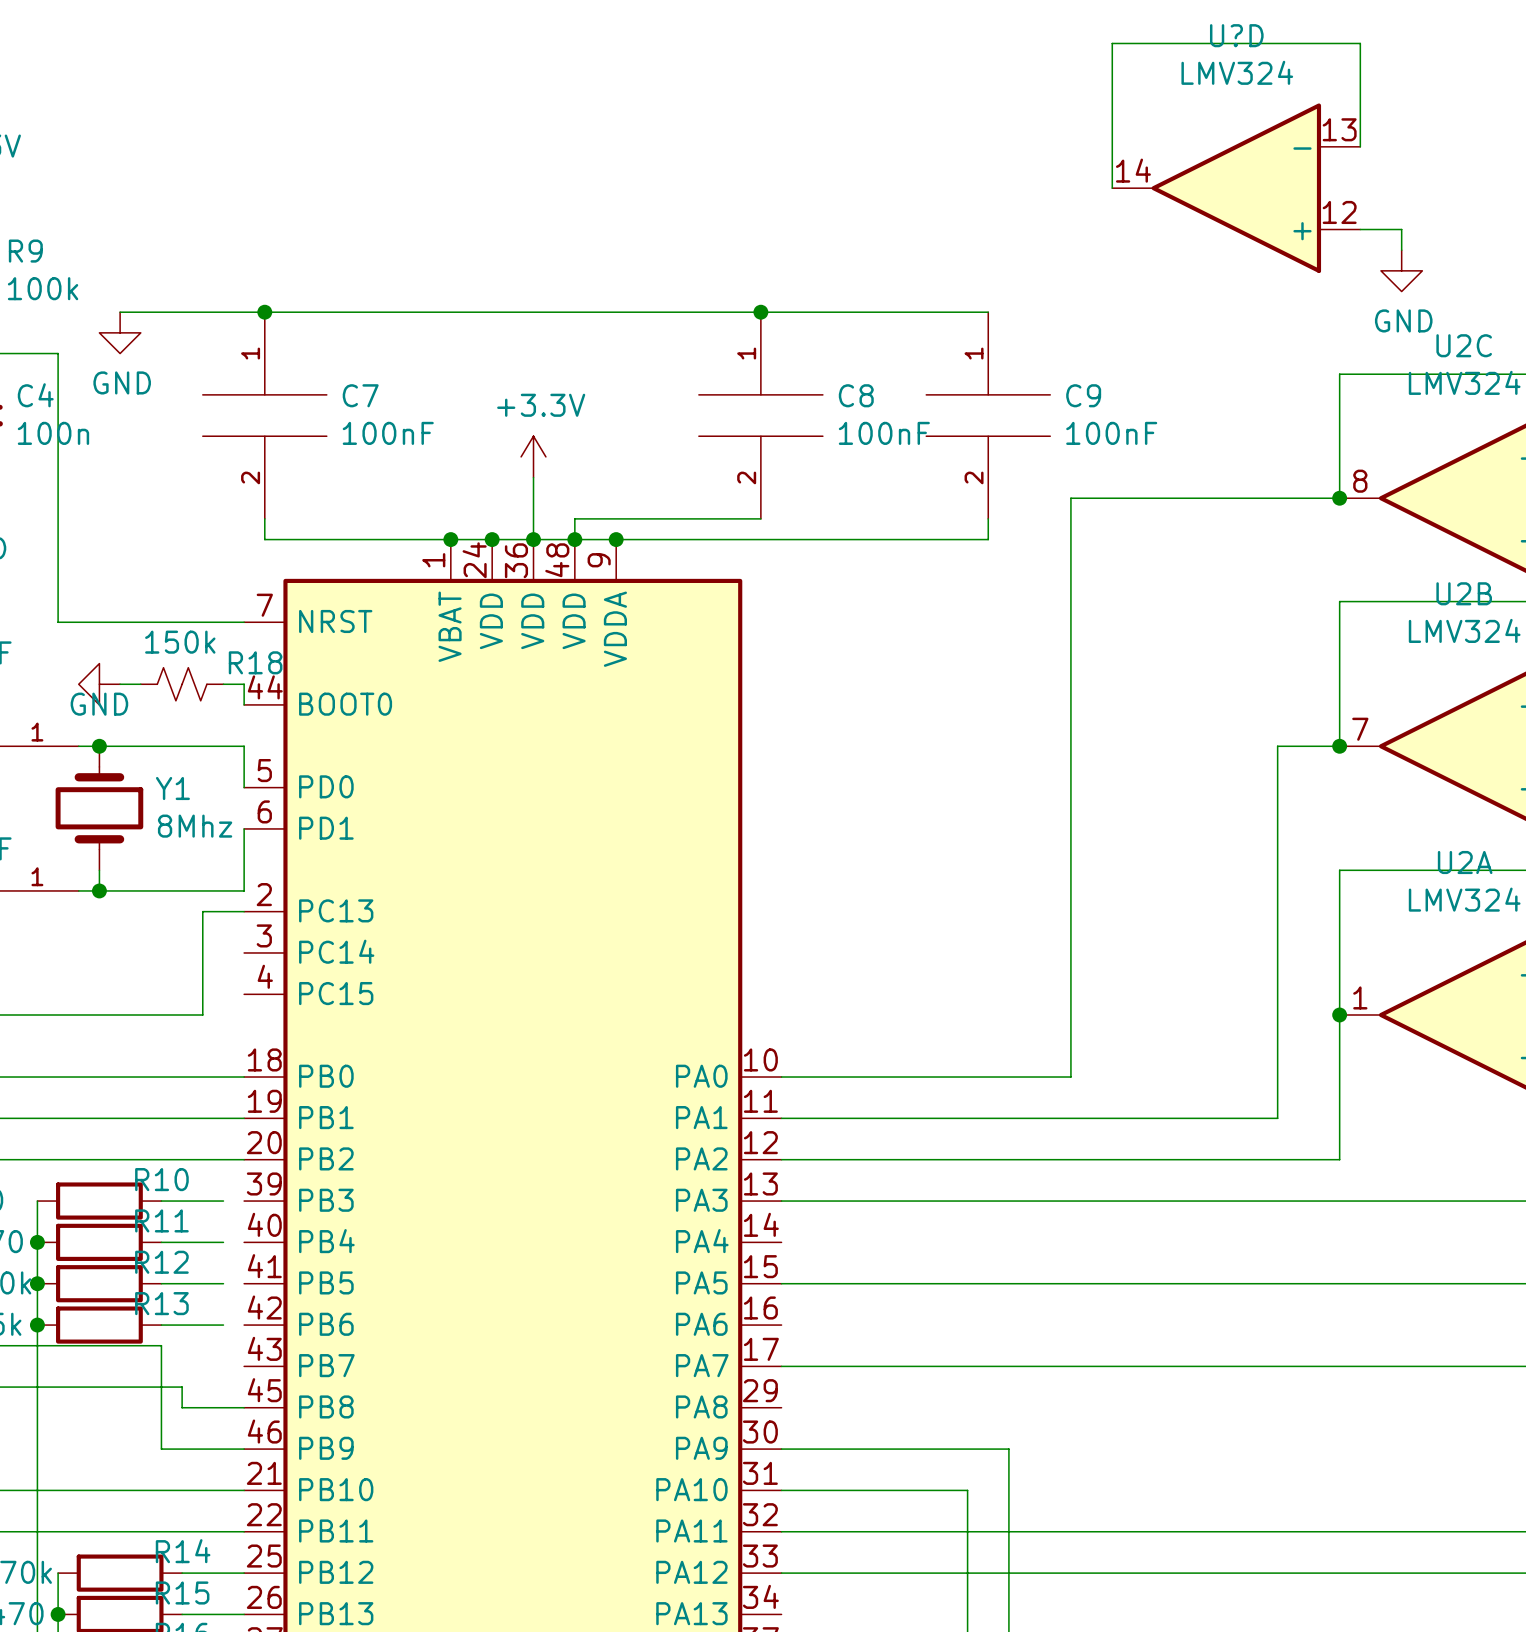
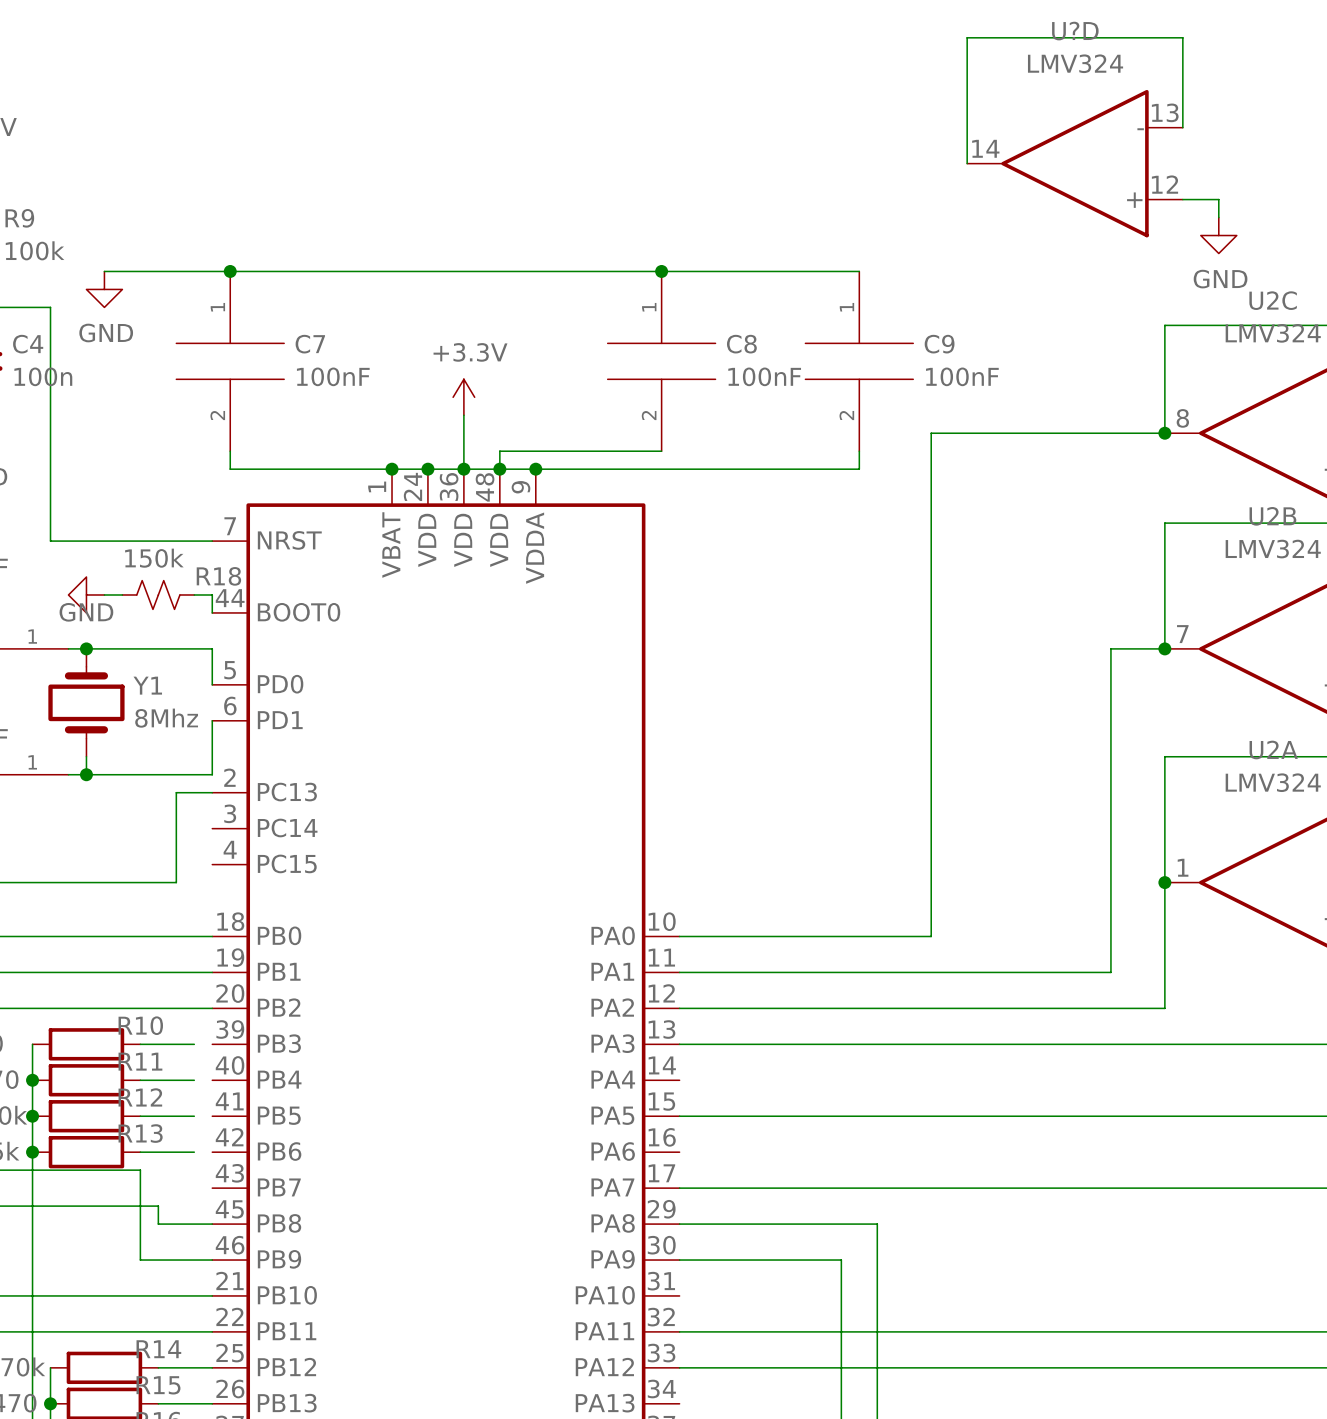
wire: none -> (679, 1224) (877, 1224) (877, 1260)
wire: (967, 1449) (1008, 1449) -> (841, 1260) (841, 1295)
wire: (781, 1490) (967, 1490) -> none

